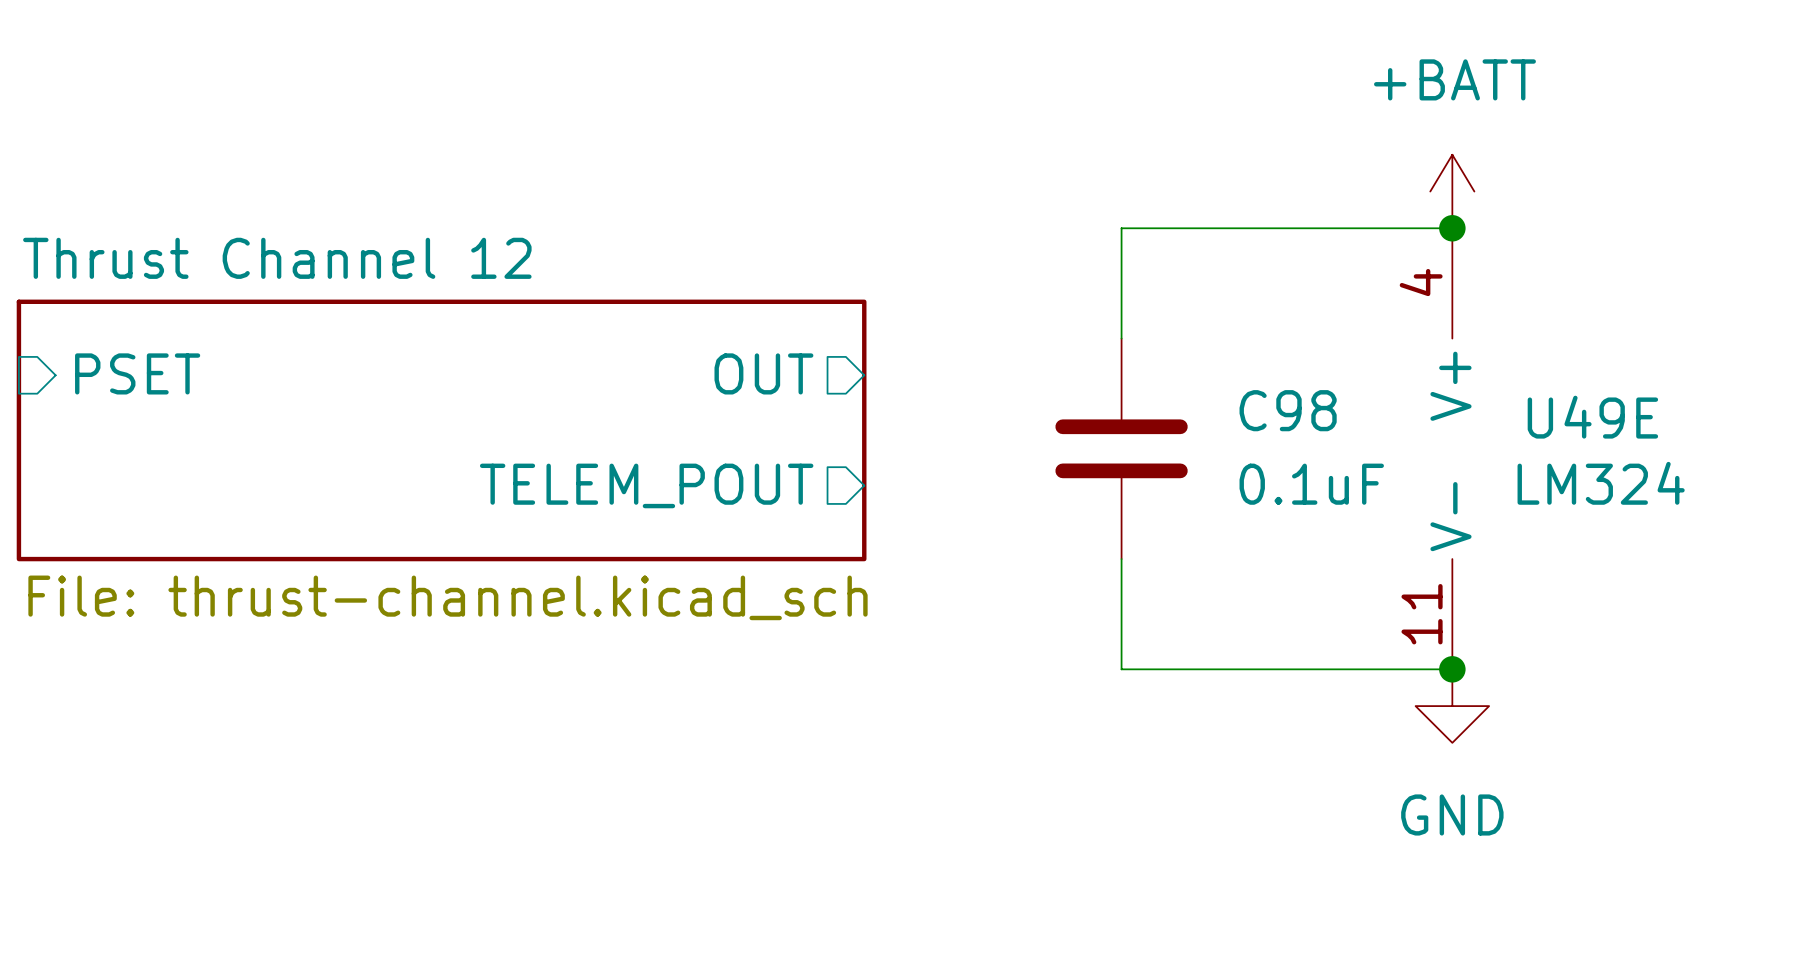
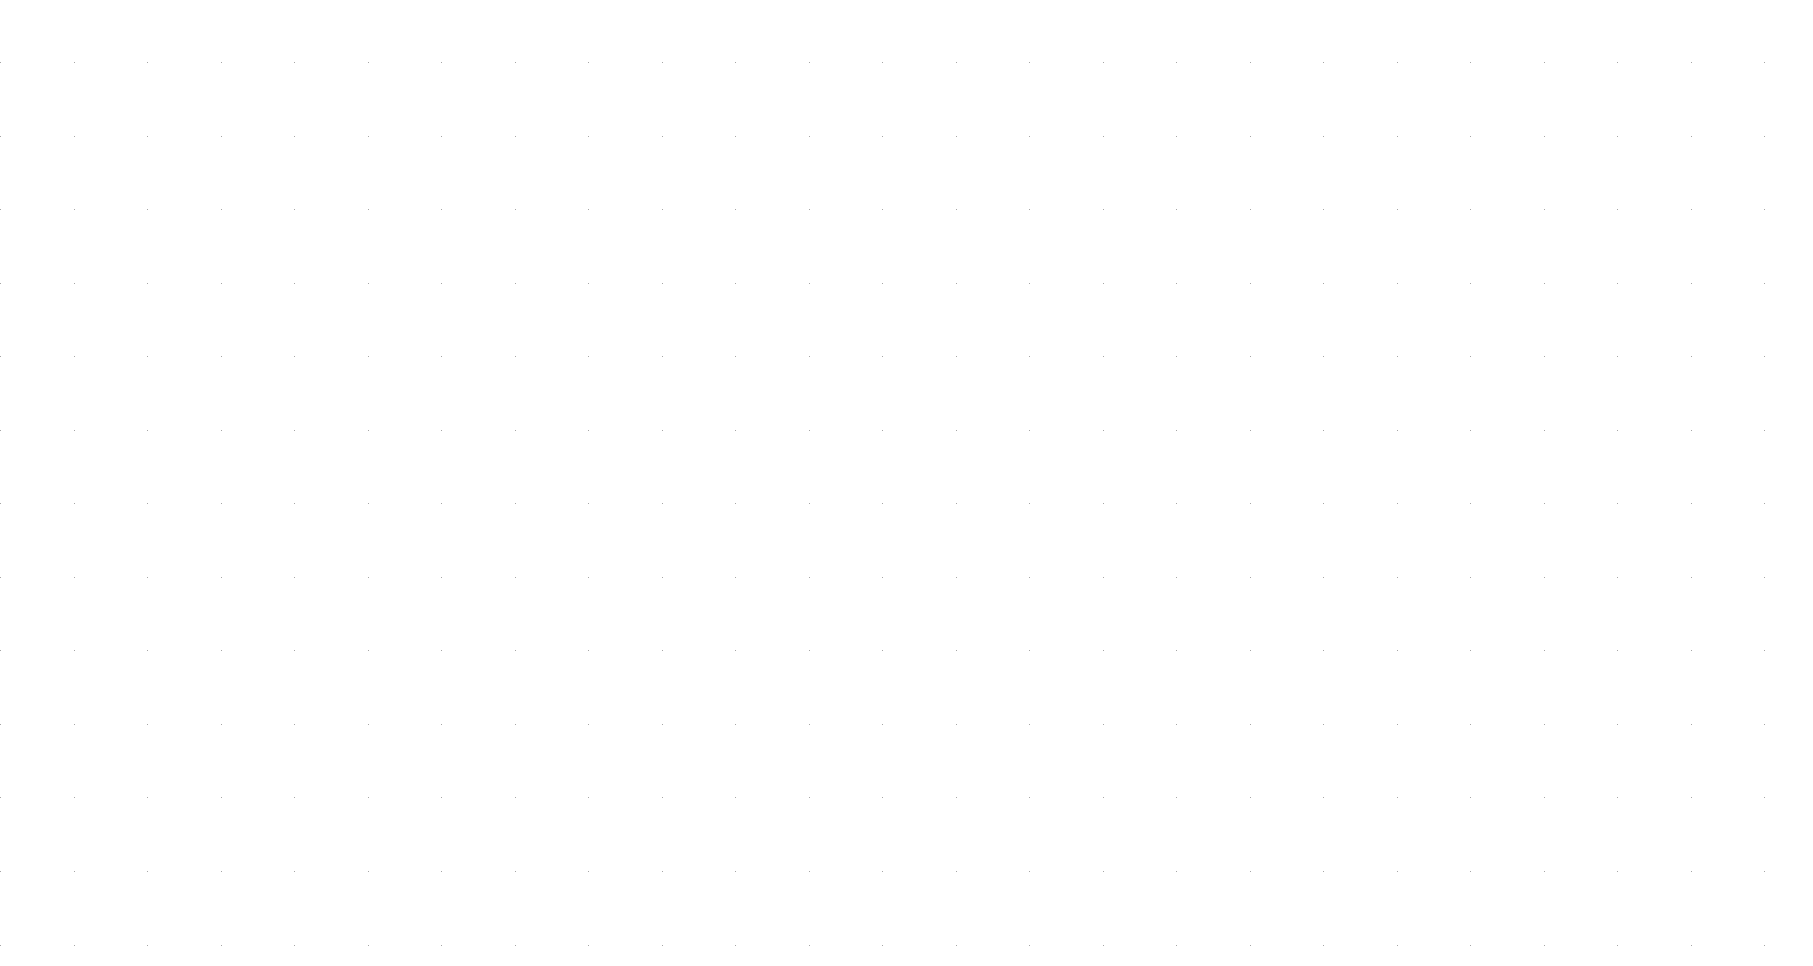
power symbol: +BATT (1452, 191) -> none
wire: (1452, 228) (1121, 228) (1121, 338) -> none
junction: (1452, 228) -> none
sheet pin: PSET (137, 373) -> none
sheet pin: OUT (763, 373) -> none
sheet Thrust Channel 12: File: thrust-channel.kicad_sch (441, 430) -> none
C98: 0.1uF (1121, 448) -> none
U49E: LM324 (1452, 448) -> none
sheet pin: TELEM_POUT (646, 485) -> none
wire: (1121, 559) (1121, 669) (1452, 669) -> none
junction: (1452, 669) -> none
power symbol: GND (1452, 706) -> none

